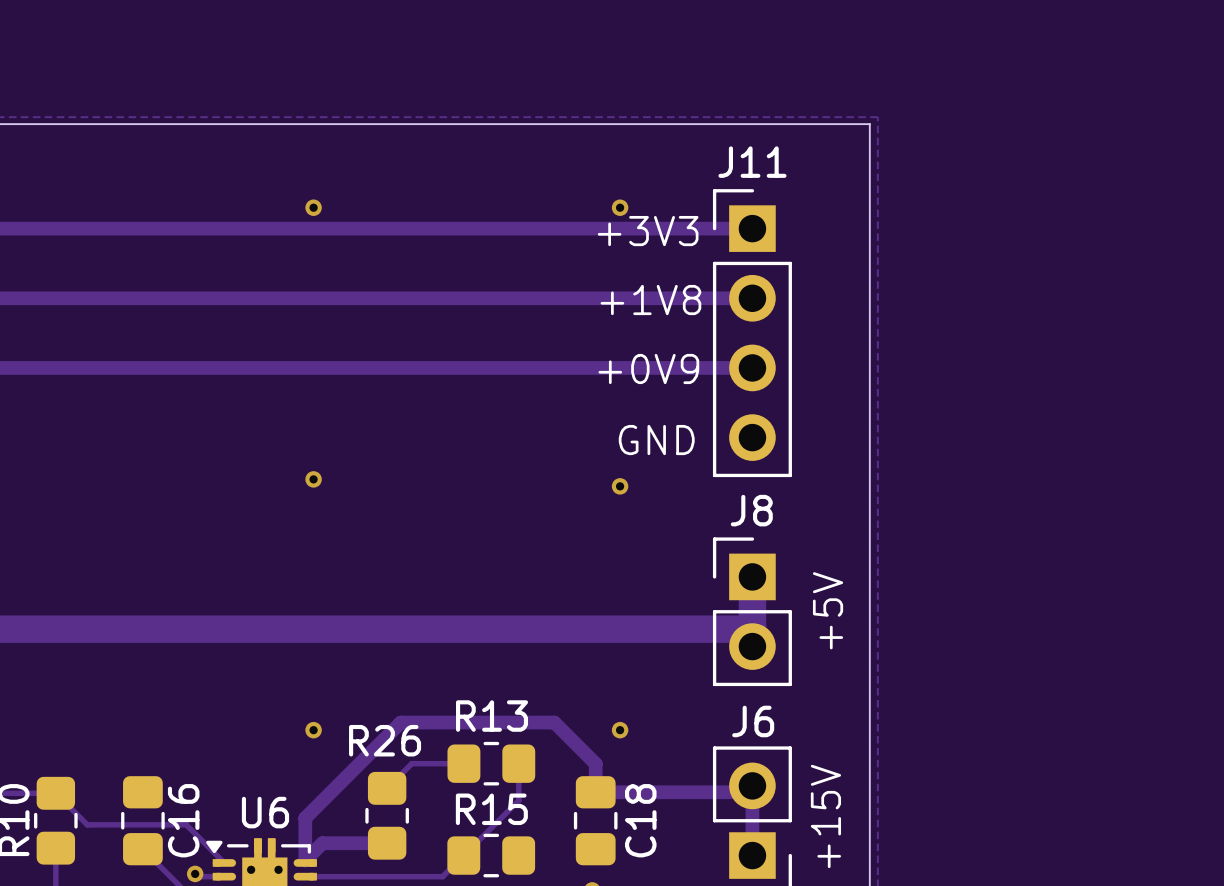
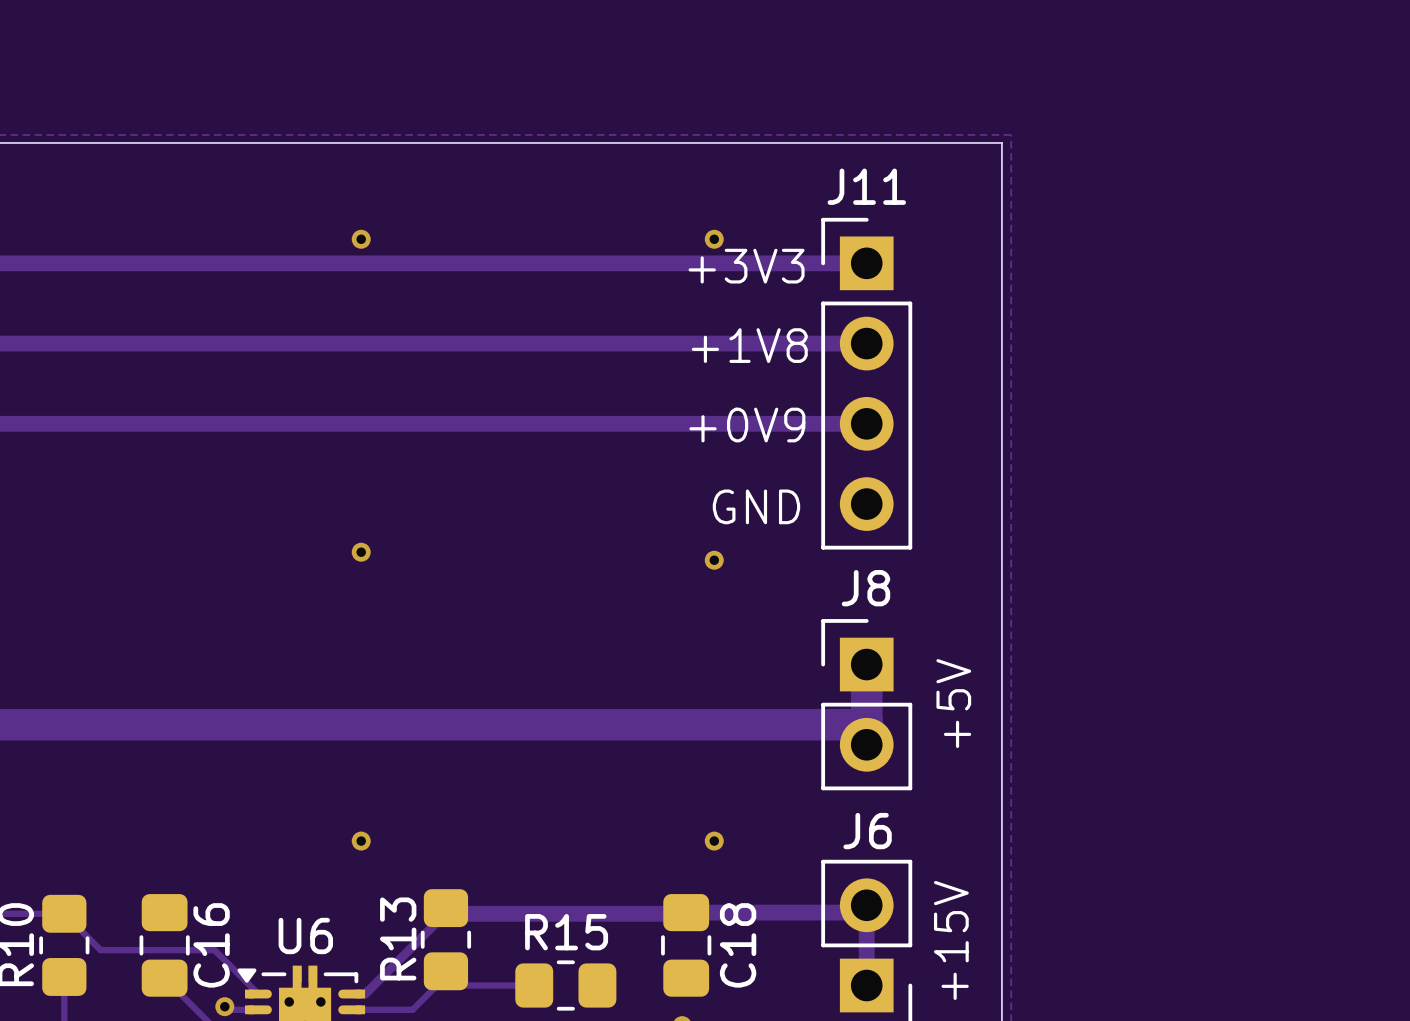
R26 name: R26 (385, 740) -> R13 (398, 938)
track: (463, 763) (411, 763) (387, 788) -> none
R13: (491, 763) -> none
track: (518, 763) (518, 800) (442, 876) (358, 876) -> (534, 985) (454, 985) (445, 976) (412, 1009)
track: (595, 792) (595, 763) (554, 722) (400, 722) (305, 818) (305, 860) (322, 843) (387, 843) -> (686, 912) (445, 913) (365, 994) (351, 994)

